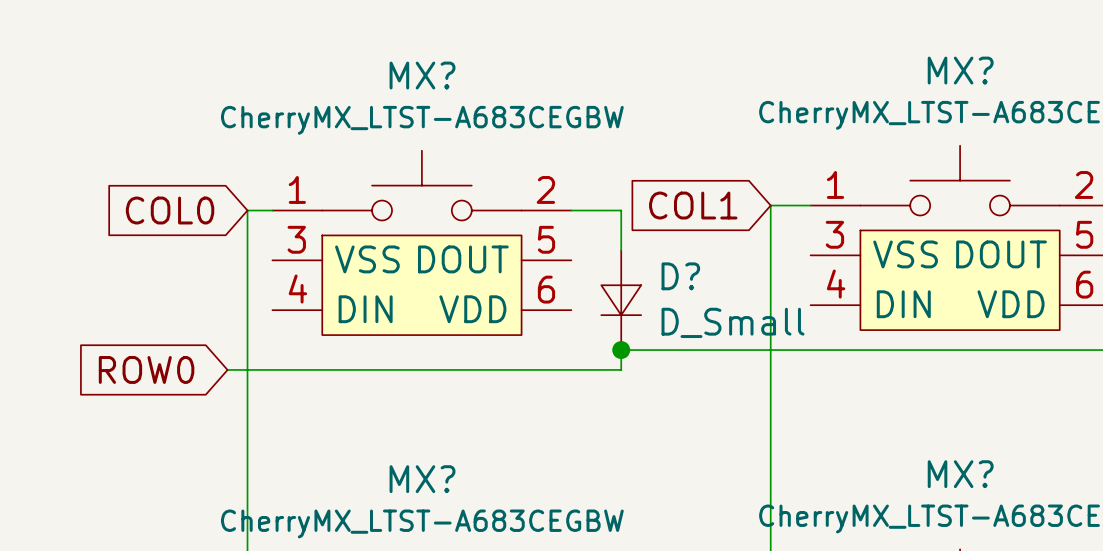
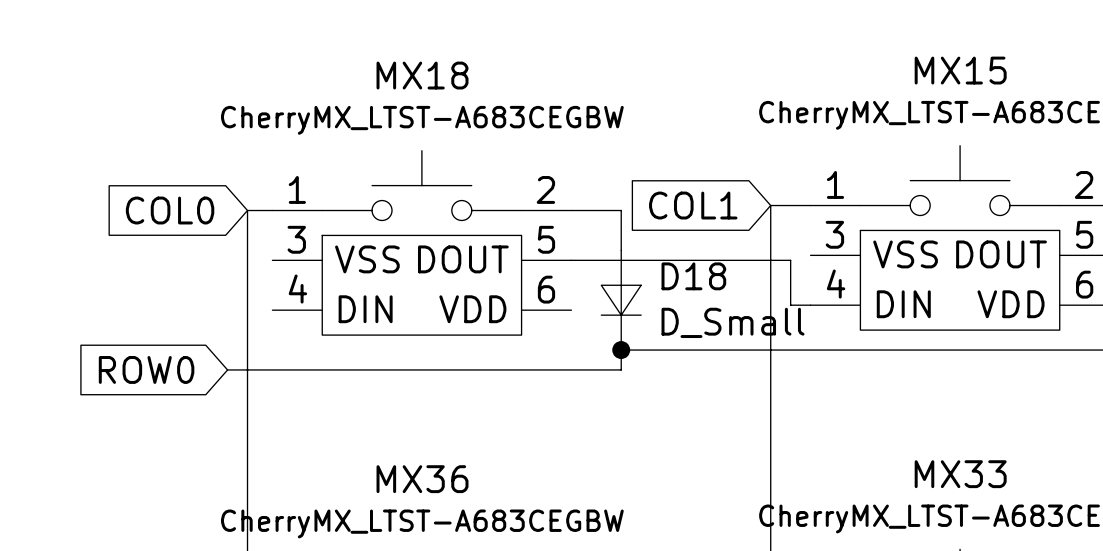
MX? name: MX? (960, 70) -> MX15 (960, 70)
MX? name: MX? (422, 75) -> MX18 (422, 75)
wire: none -> (571, 260) (790, 260) (790, 305) (810, 305)
D? name: D? (680, 276) -> D18 (693, 276)
MX? name: MX? (960, 474) -> MX33 (960, 474)
MX? name: MX? (422, 479) -> MX36 (422, 479)

